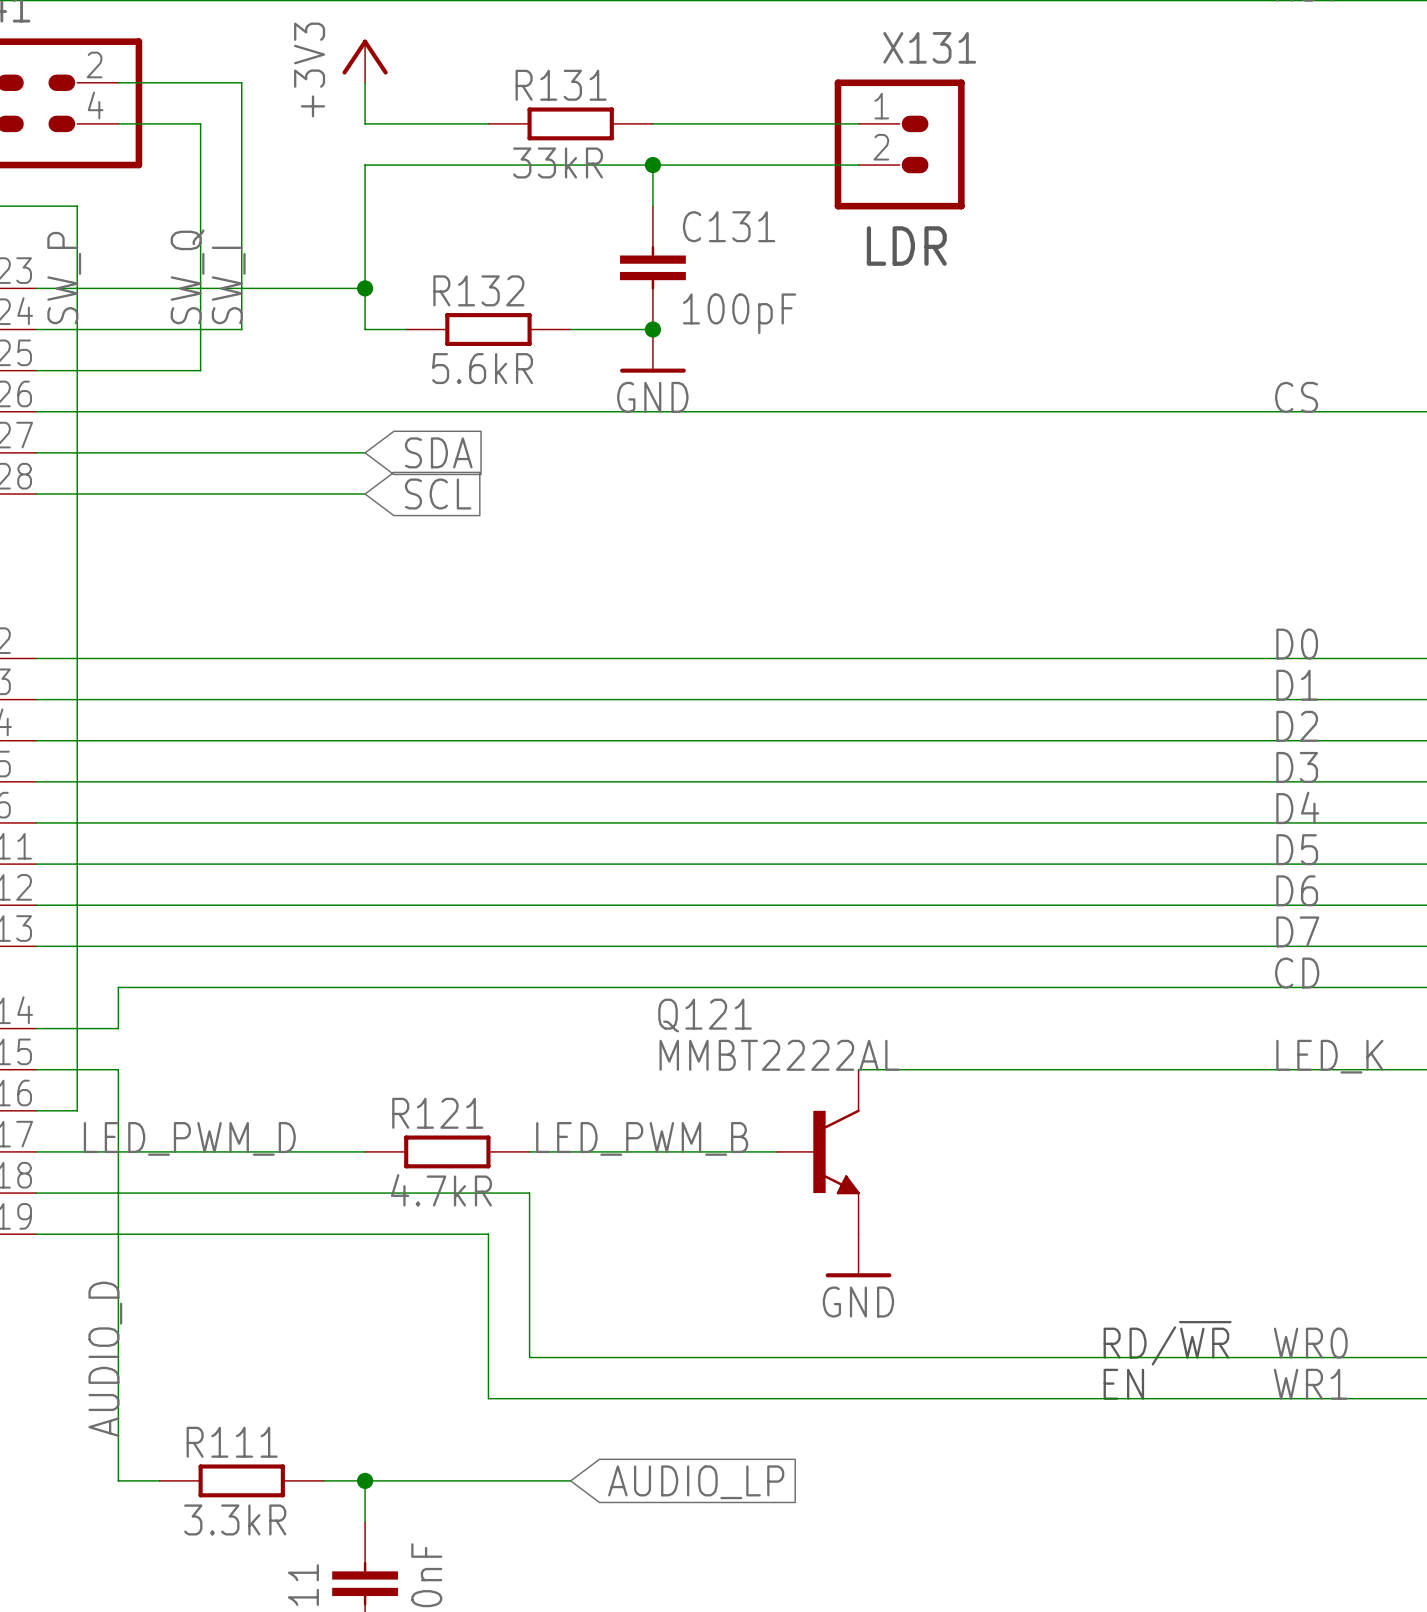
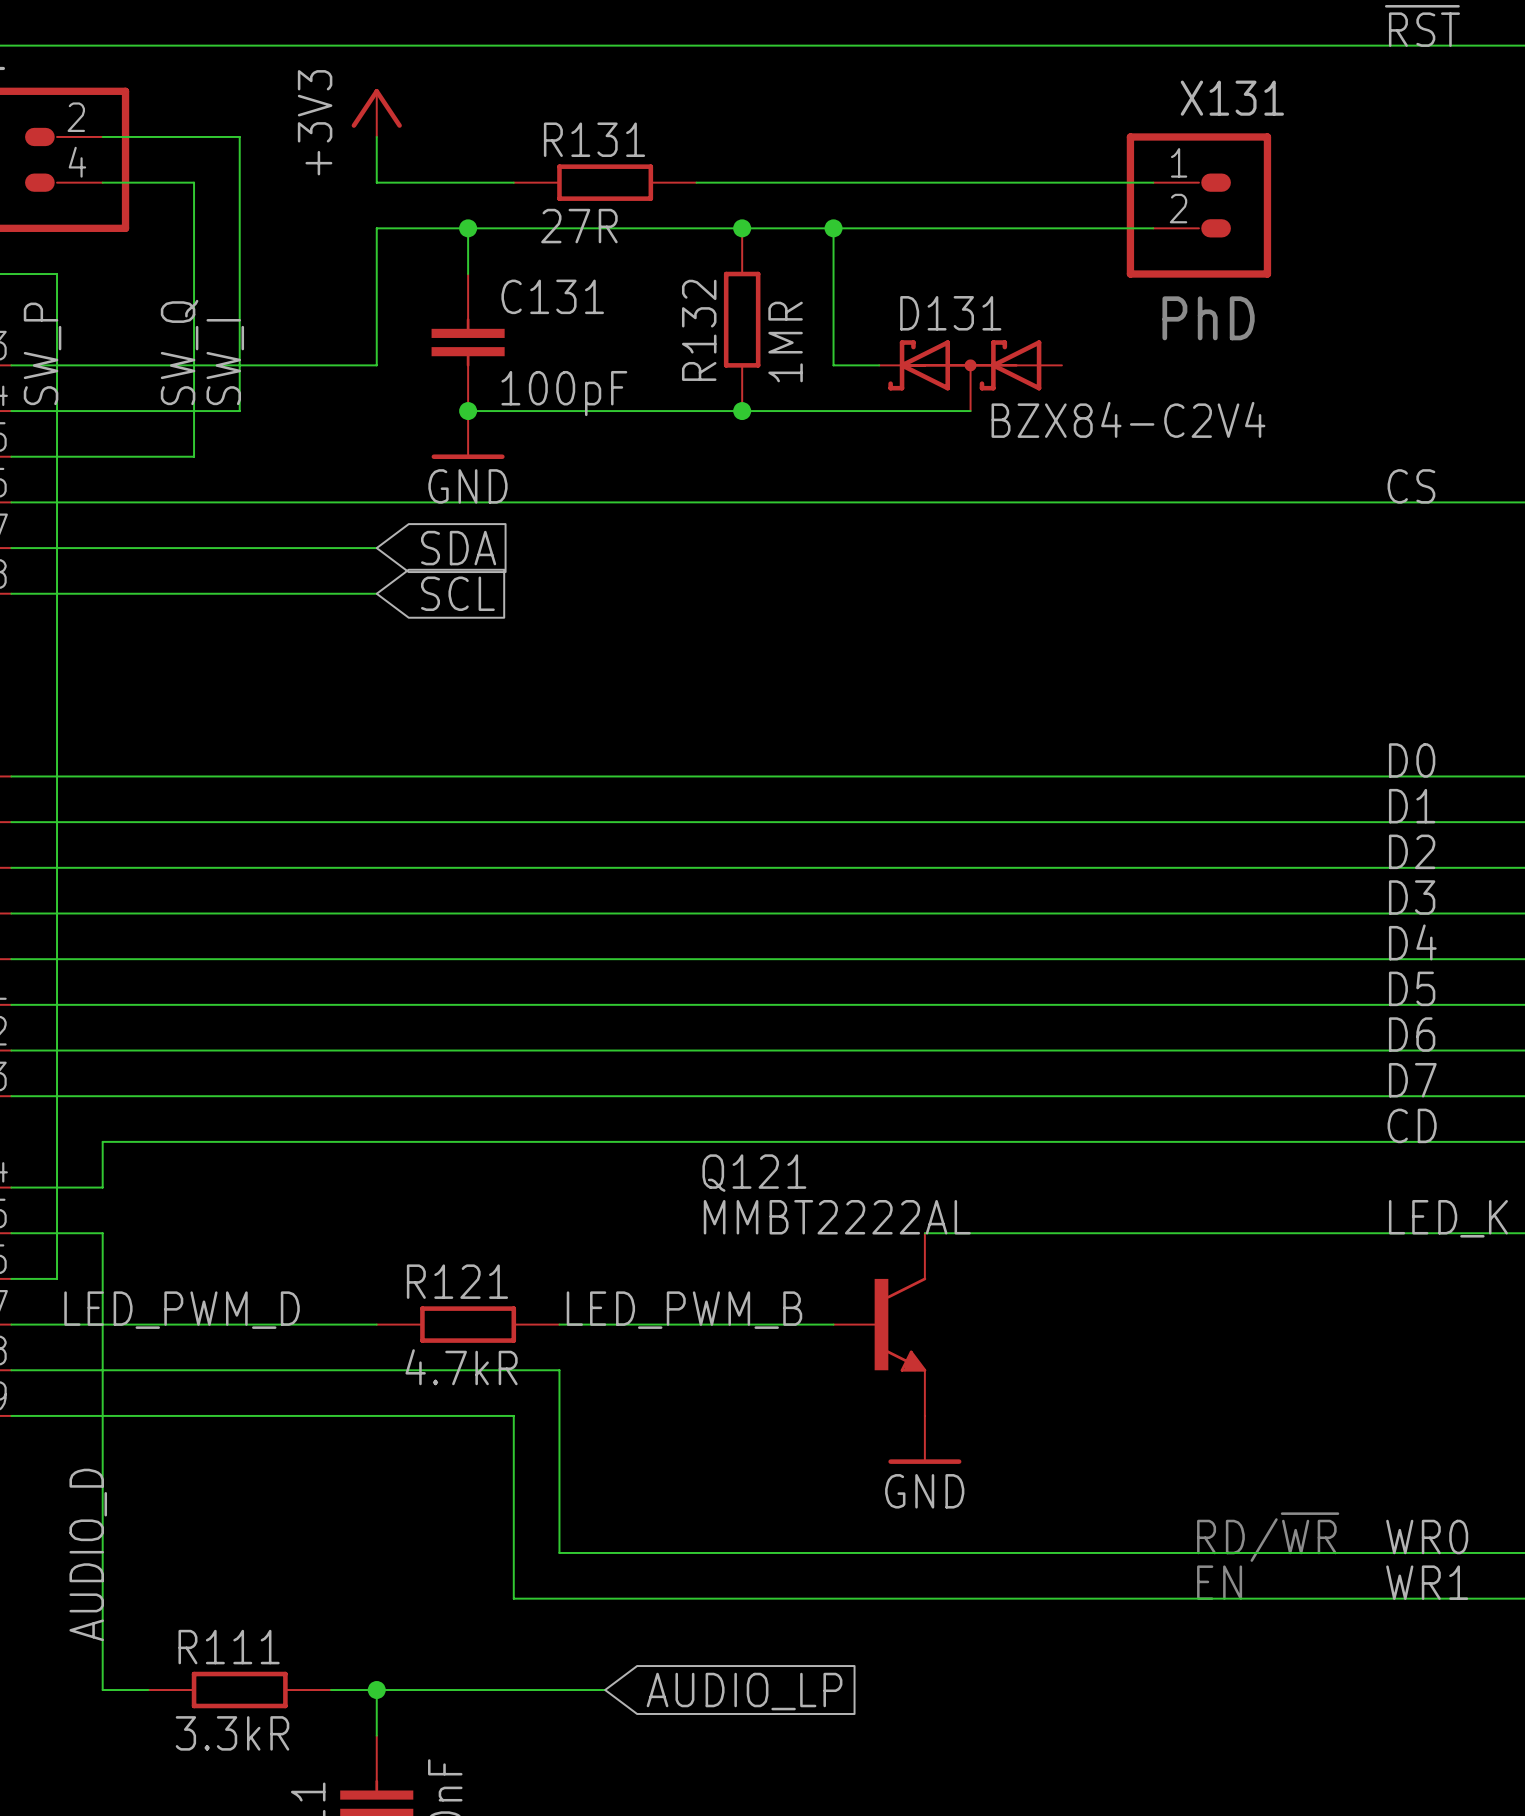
wire: none -> (924, 182) (1153, 182)
X131 position: (899, 144) -> (1198, 205)
R131 value: 33kR (558, 162) -> 27R (579, 226)
junction: none -> (468, 228)
wire: (652, 165) (652, 206) -> (468, 228) (468, 274)
junction position: (652, 165) -> (742, 228)
wire: none -> (833, 228) (833, 365) (879, 365)
junction: none -> (833, 228)
wire: none -> (924, 228) (1153, 228)
text: LDR (906, 246) -> none
text: none -> PhD (1208, 318)
C131 position: (652, 267) -> (468, 342)
wire: (365, 288) (365, 329) (406, 329) -> none
junction: (365, 288) -> none
R132 name position: R132 (478, 290) -> R132 (699, 330)
D131: none -> BZX84-C2V4 (970, 375)
wire: none -> (468, 411) (605, 411)
junction: none -> (468, 411)
R132 rotation: 0° (488, 329) -> 90° clockwise (742, 319)
R132 position: (488, 329) -> (742, 319)
wire: none -> (696, 411) (970, 411)
junction position: (652, 329) -> (742, 411)
power symbol position: GND (652, 351) -> GND (468, 435)
R132 value: 5.6kR (482, 368) -> 1MR (785, 341)

